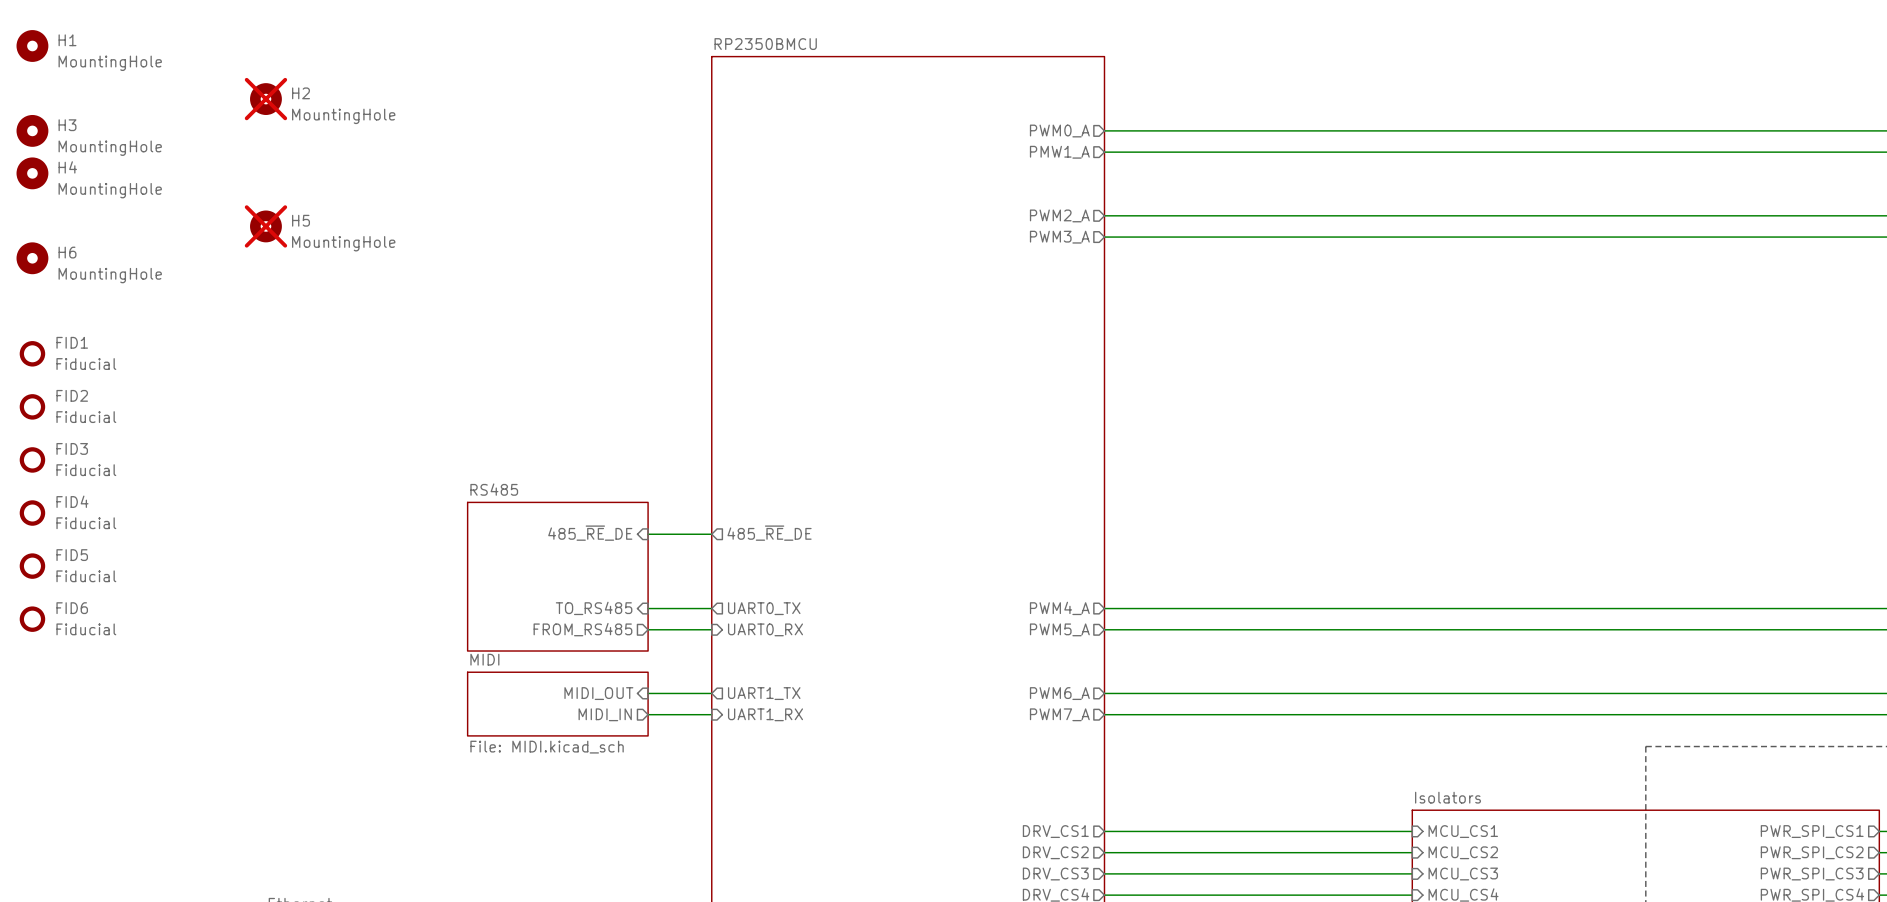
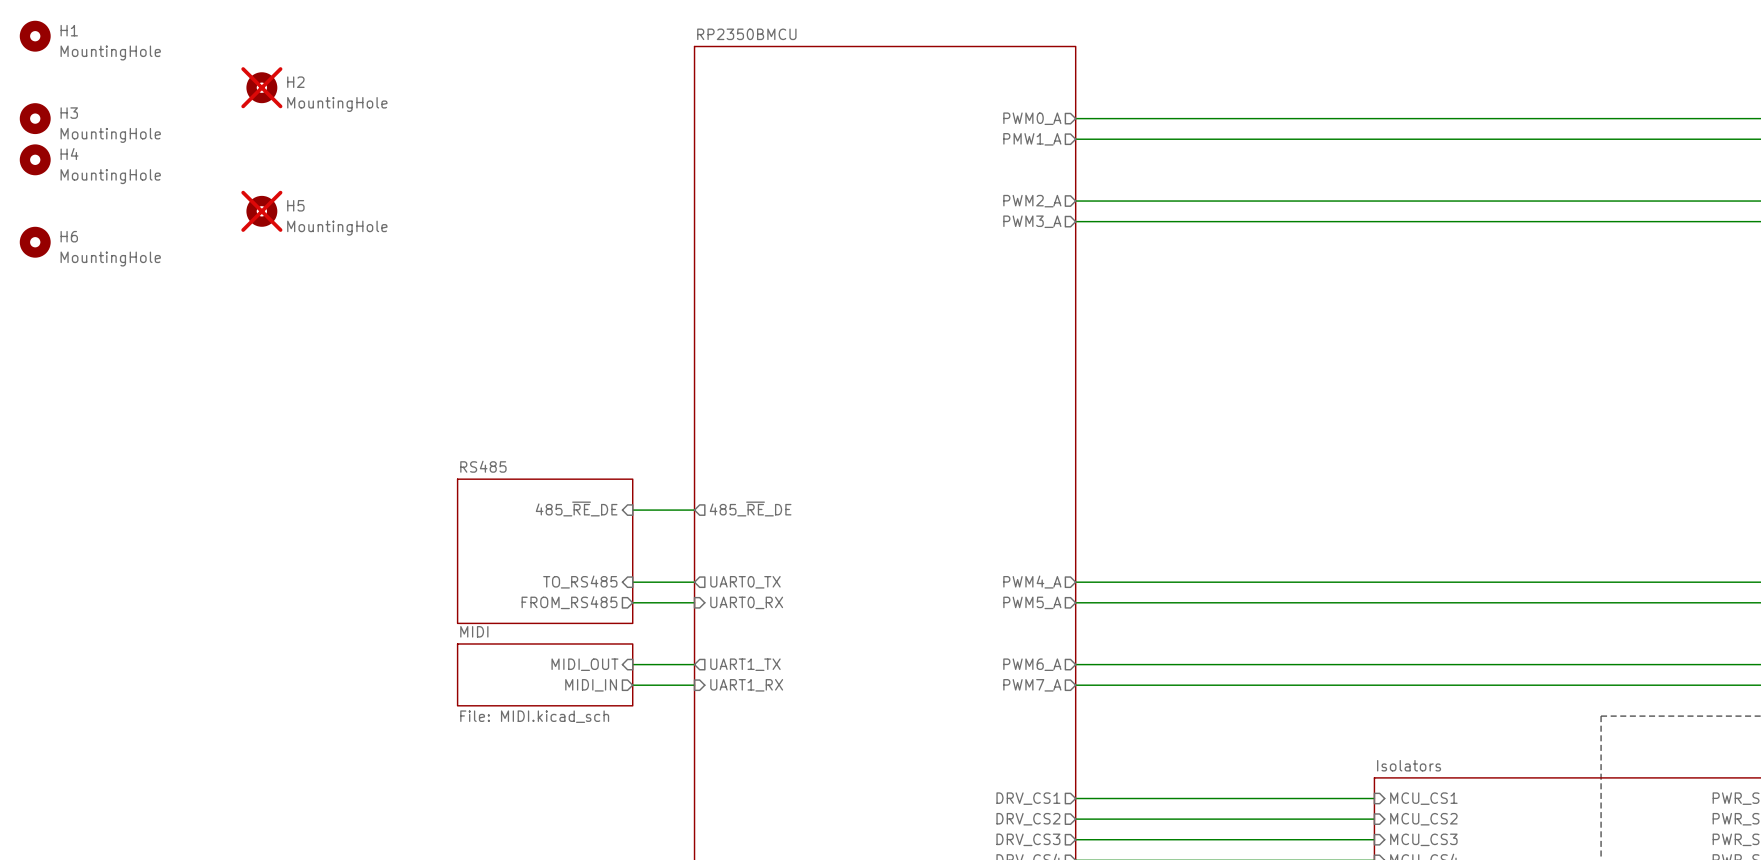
FID1: Fiducial (32, 353) -> none
FID2: Fiducial (32, 406) -> none
FID3: Fiducial (32, 459) -> none
FID4: Fiducial (32, 513) -> none
FID5: Fiducial (32, 566) -> none
FID6: Fiducial (32, 619) -> none

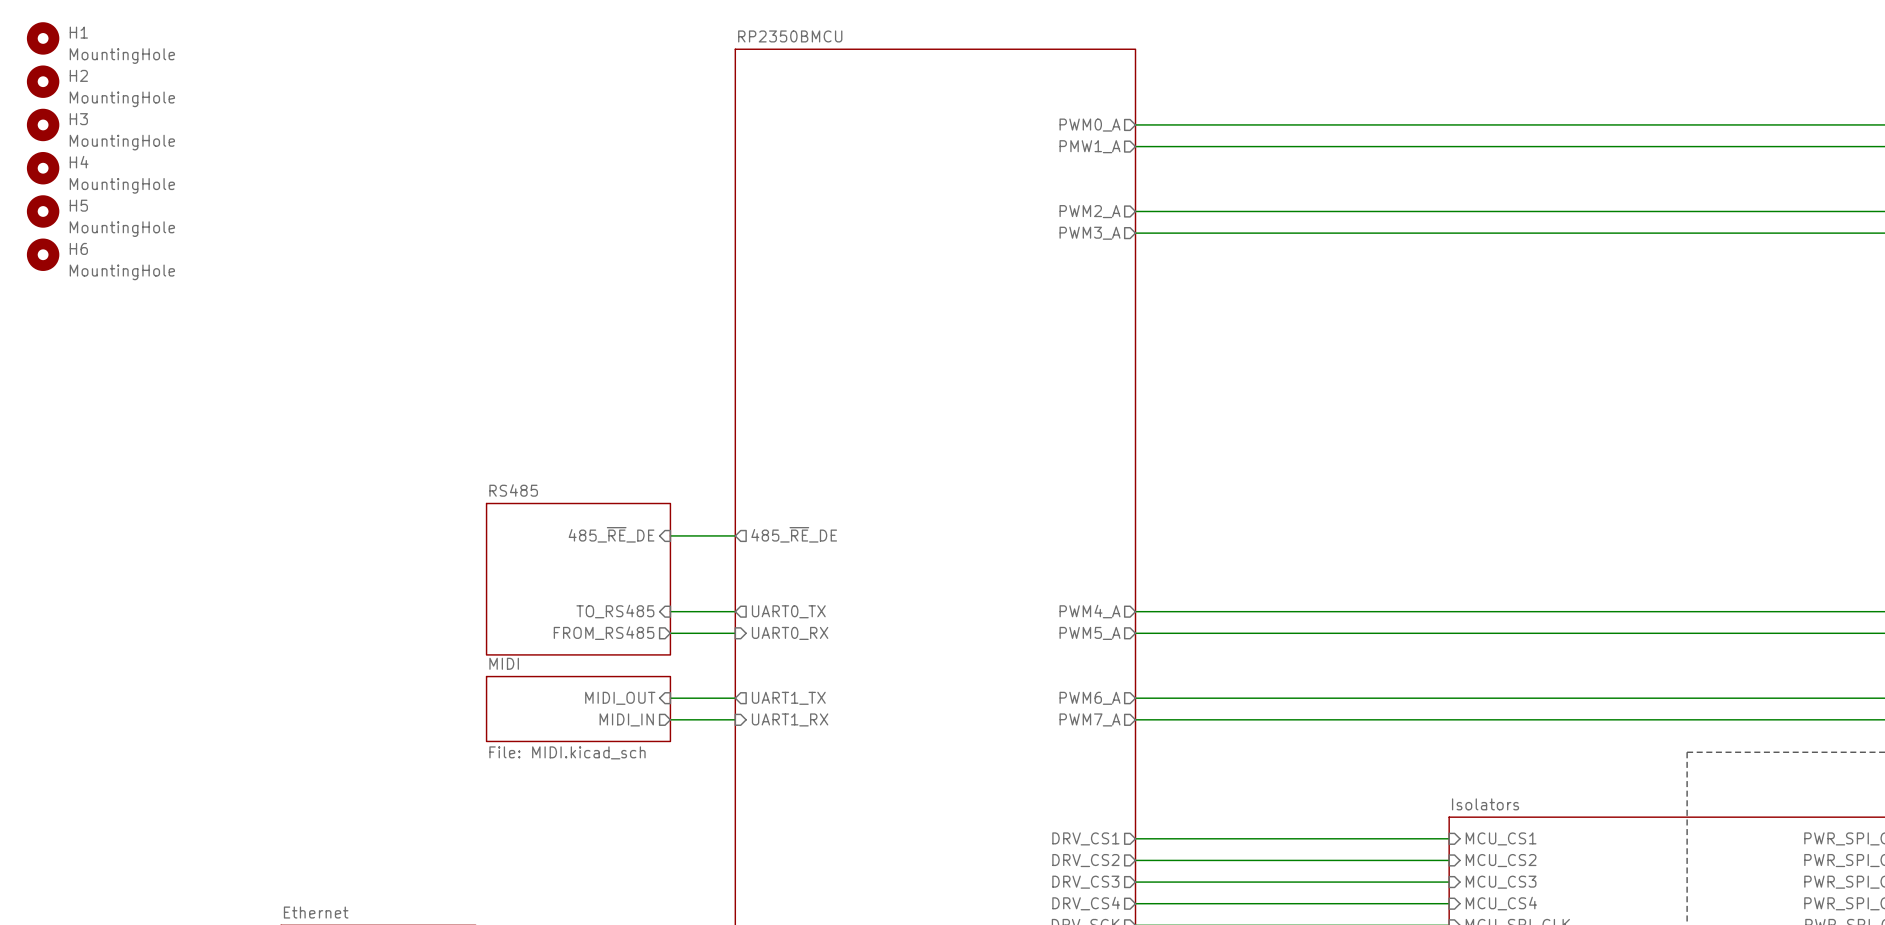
H2 position: (261, 87) -> (43, 81)
H2 do-not-place cross: (261, 87) -> none
H5 position: (261, 211) -> (43, 211)
H5 do-not-place cross: (261, 211) -> none

